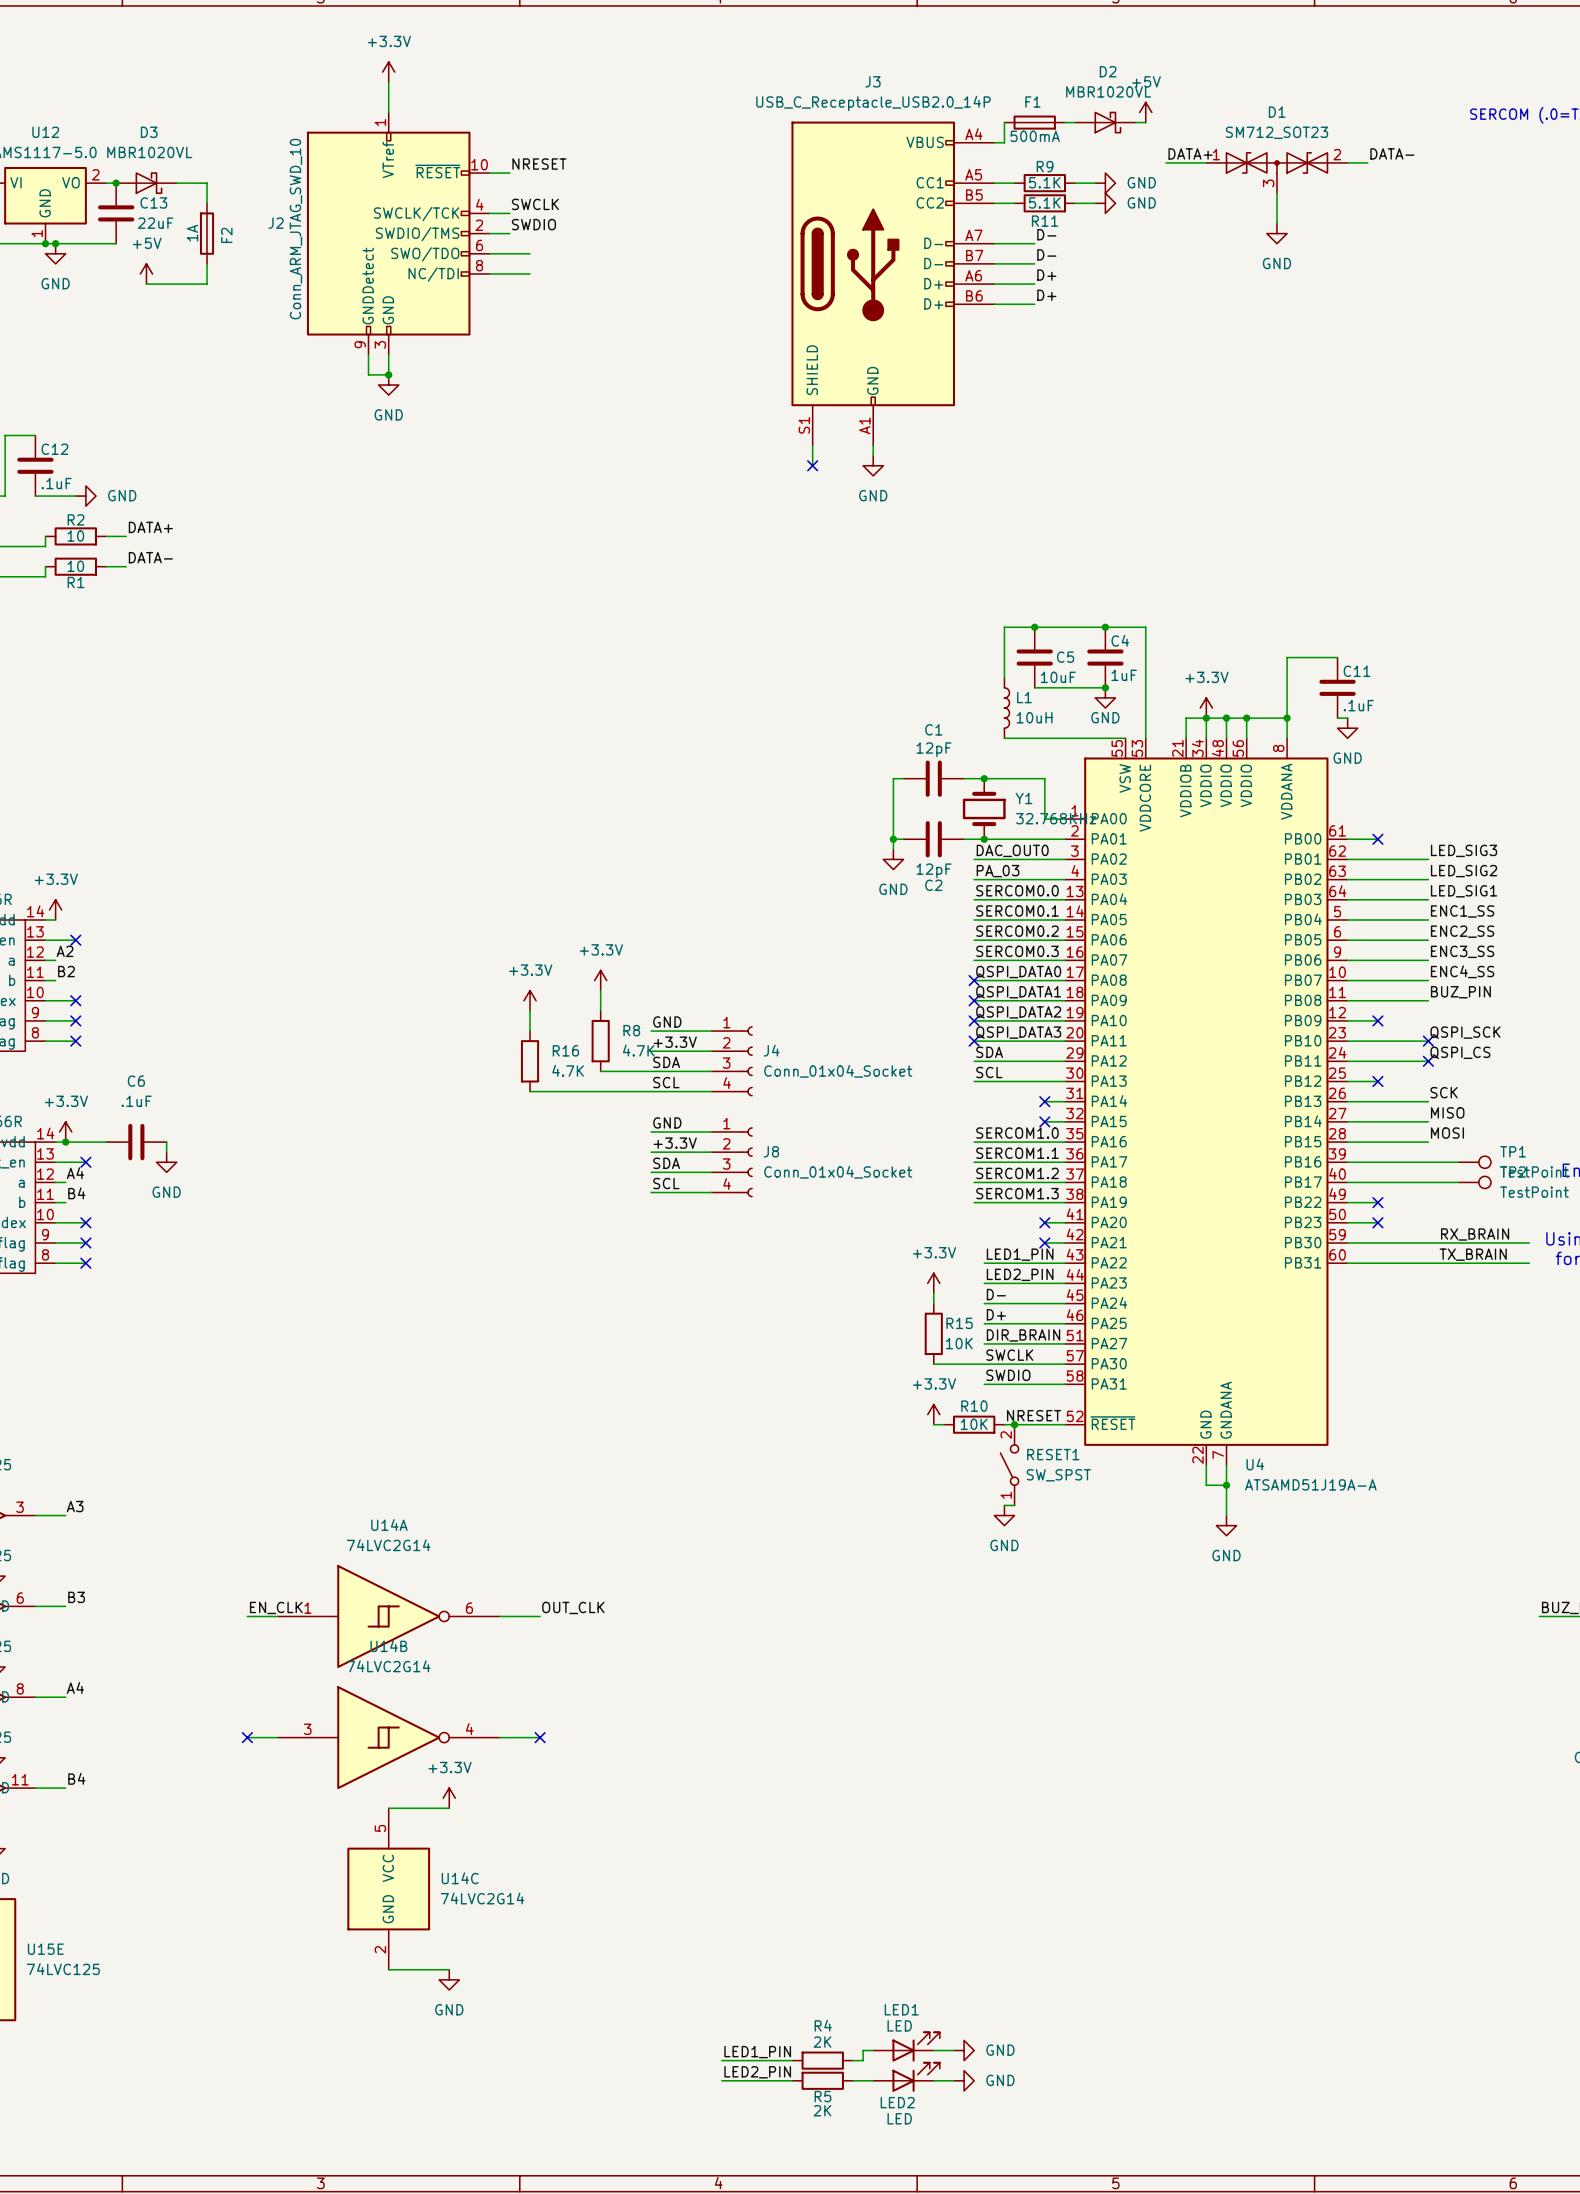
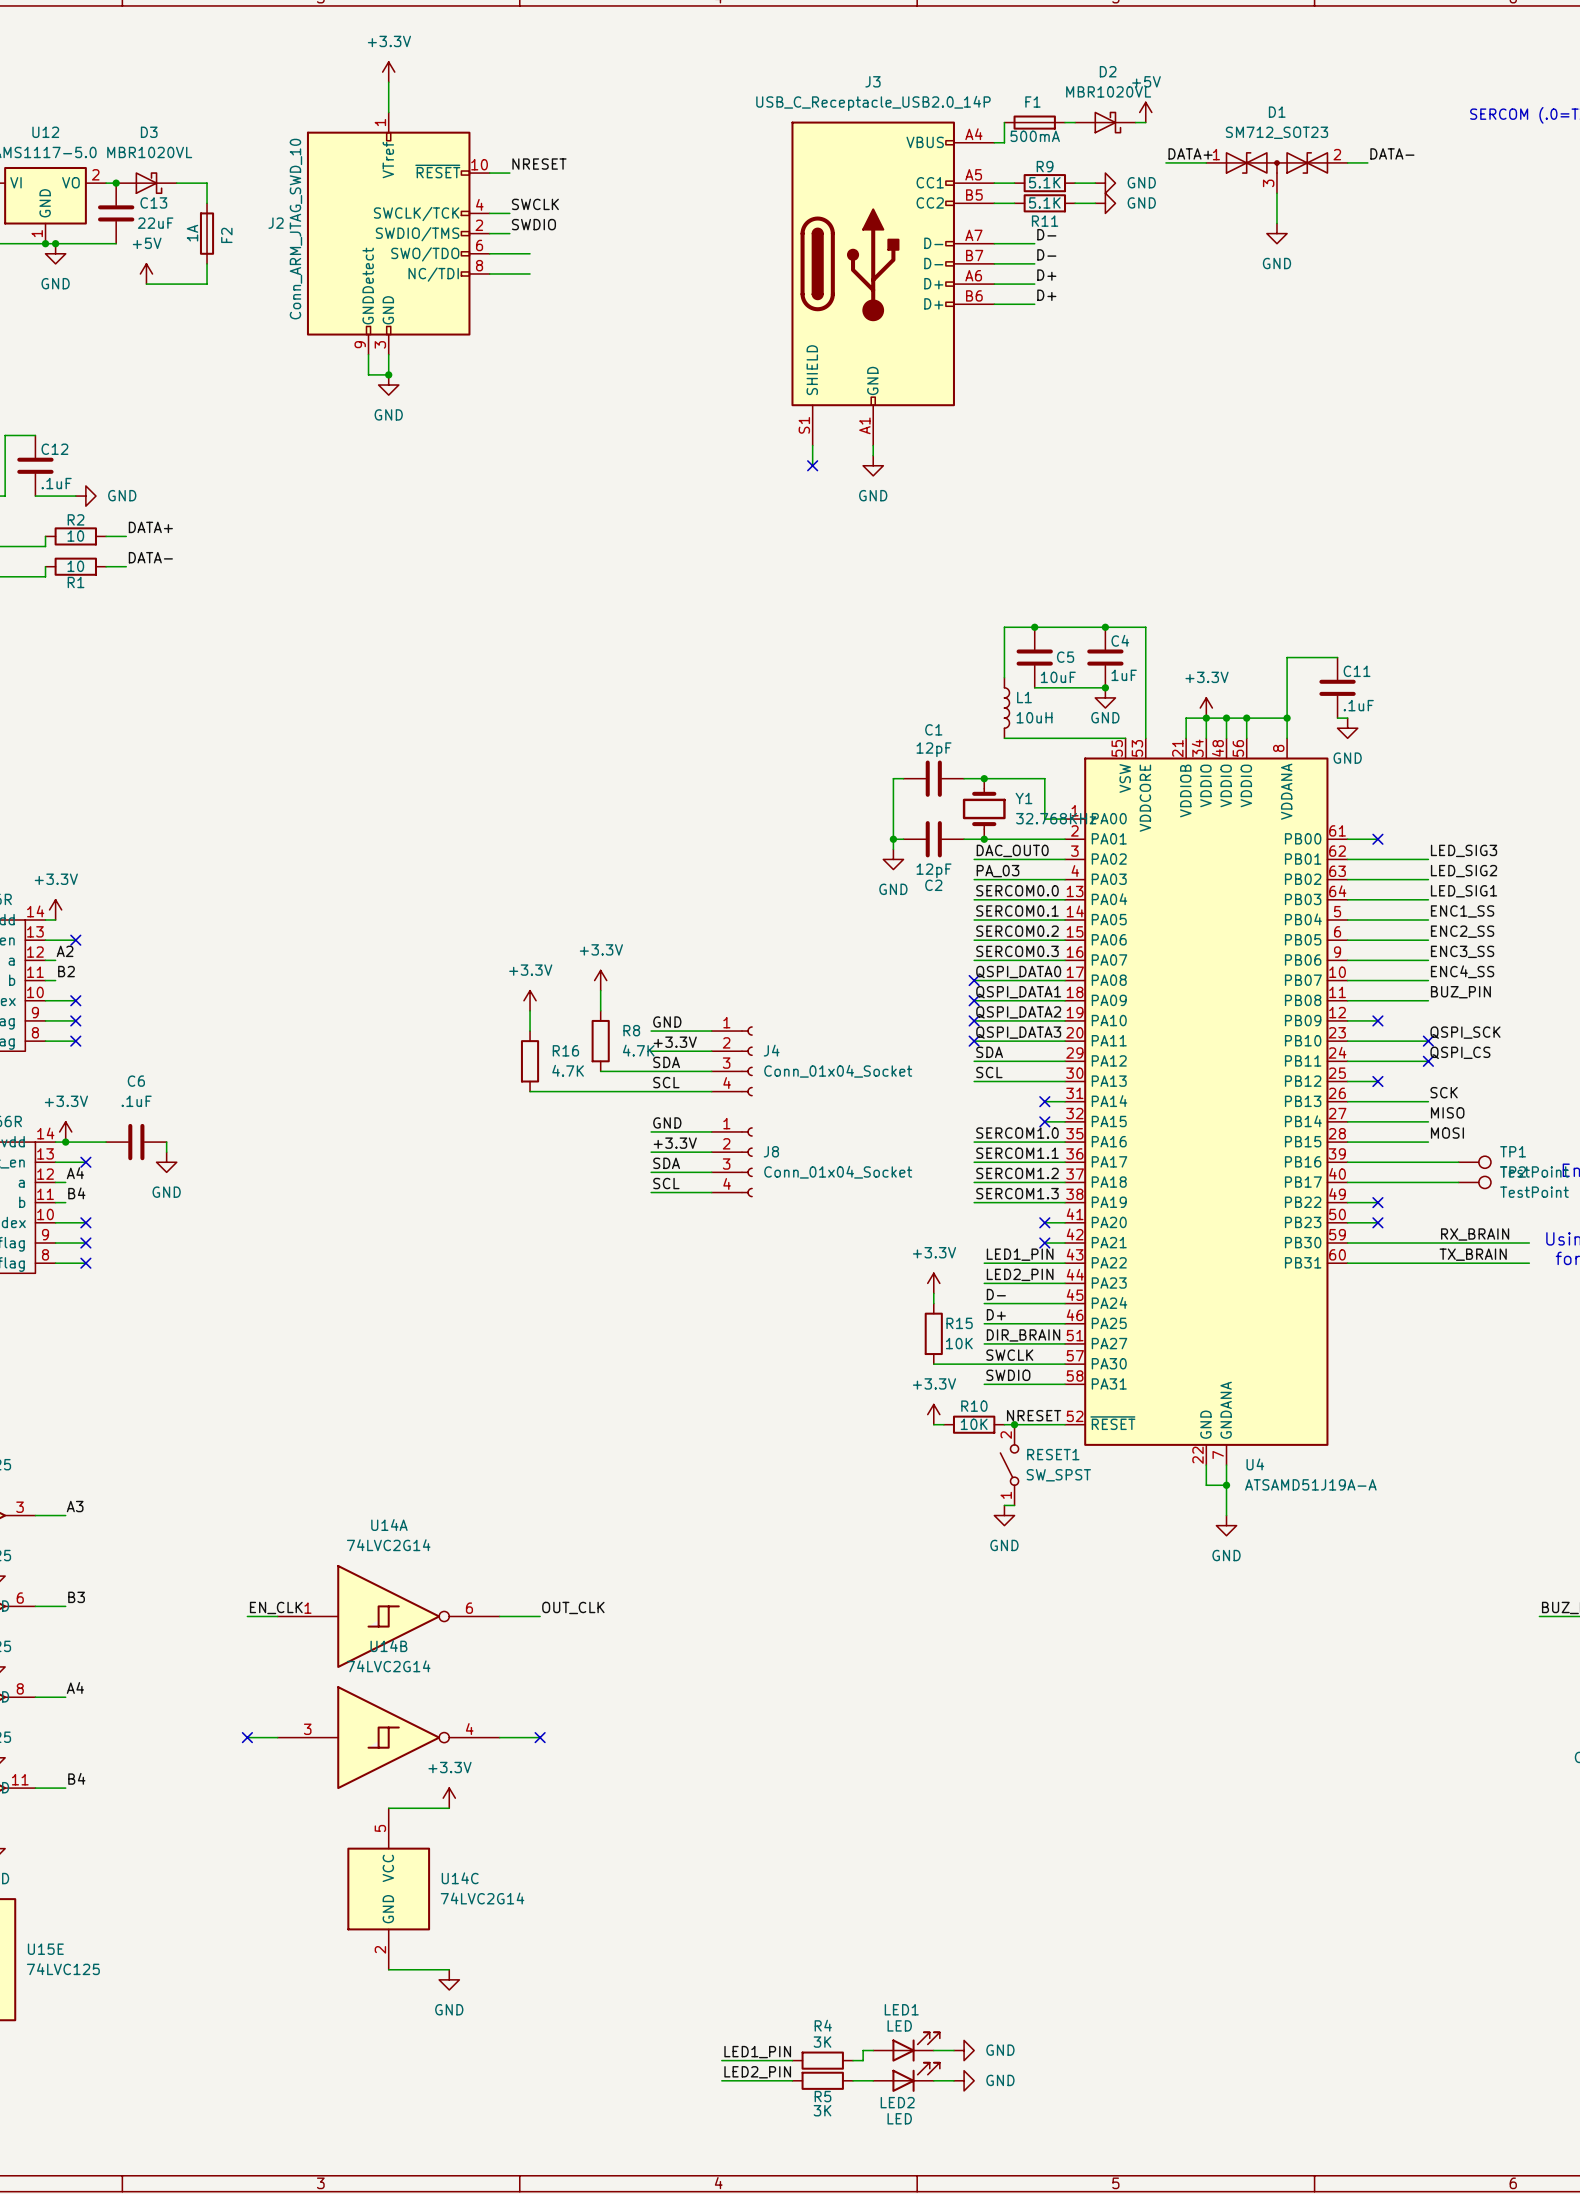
R4 value: 2K (822, 2042) -> 3K (822, 2042)
R5 value: 2K (822, 2110) -> 3K (822, 2110)

